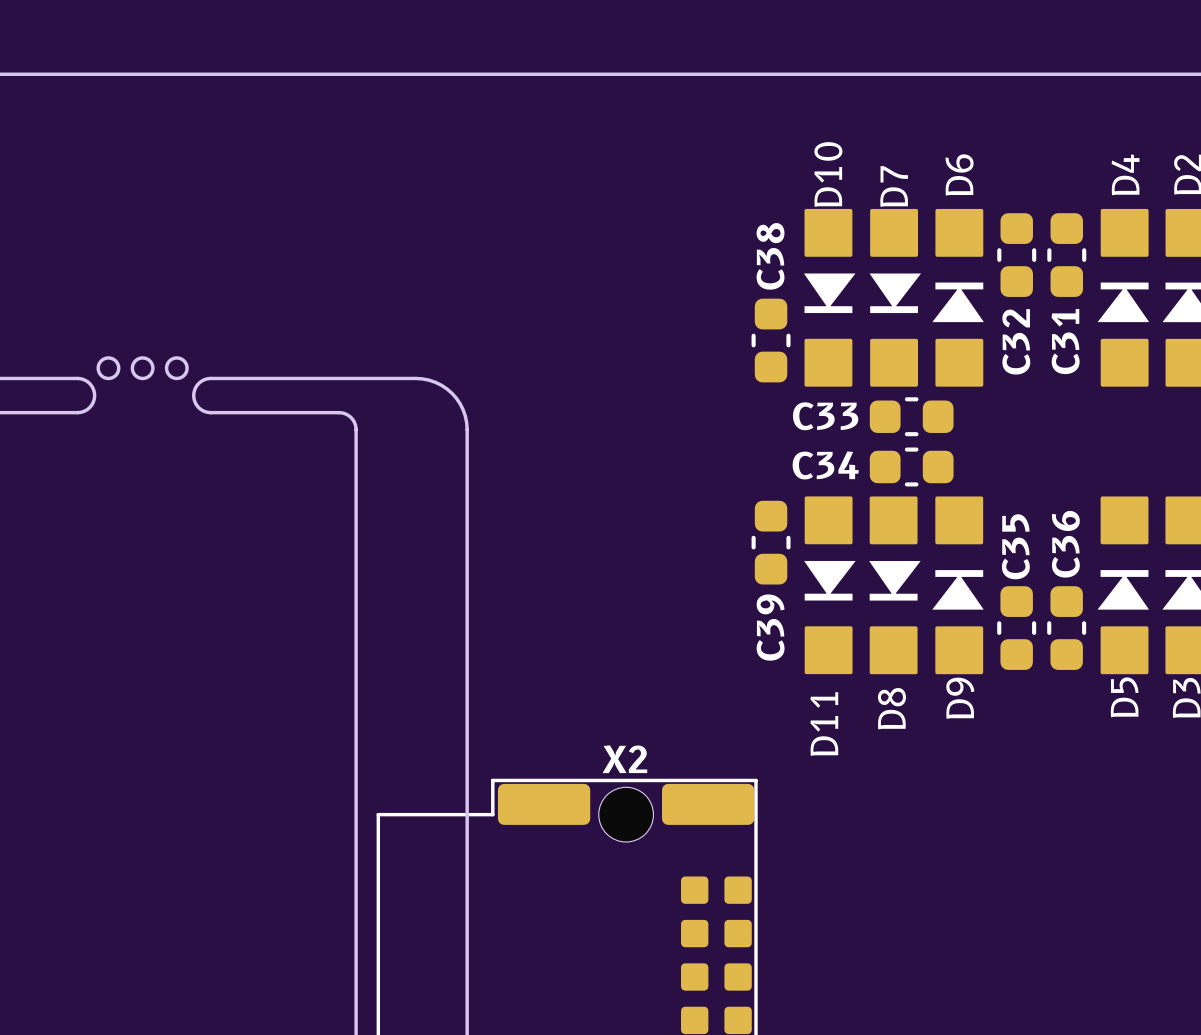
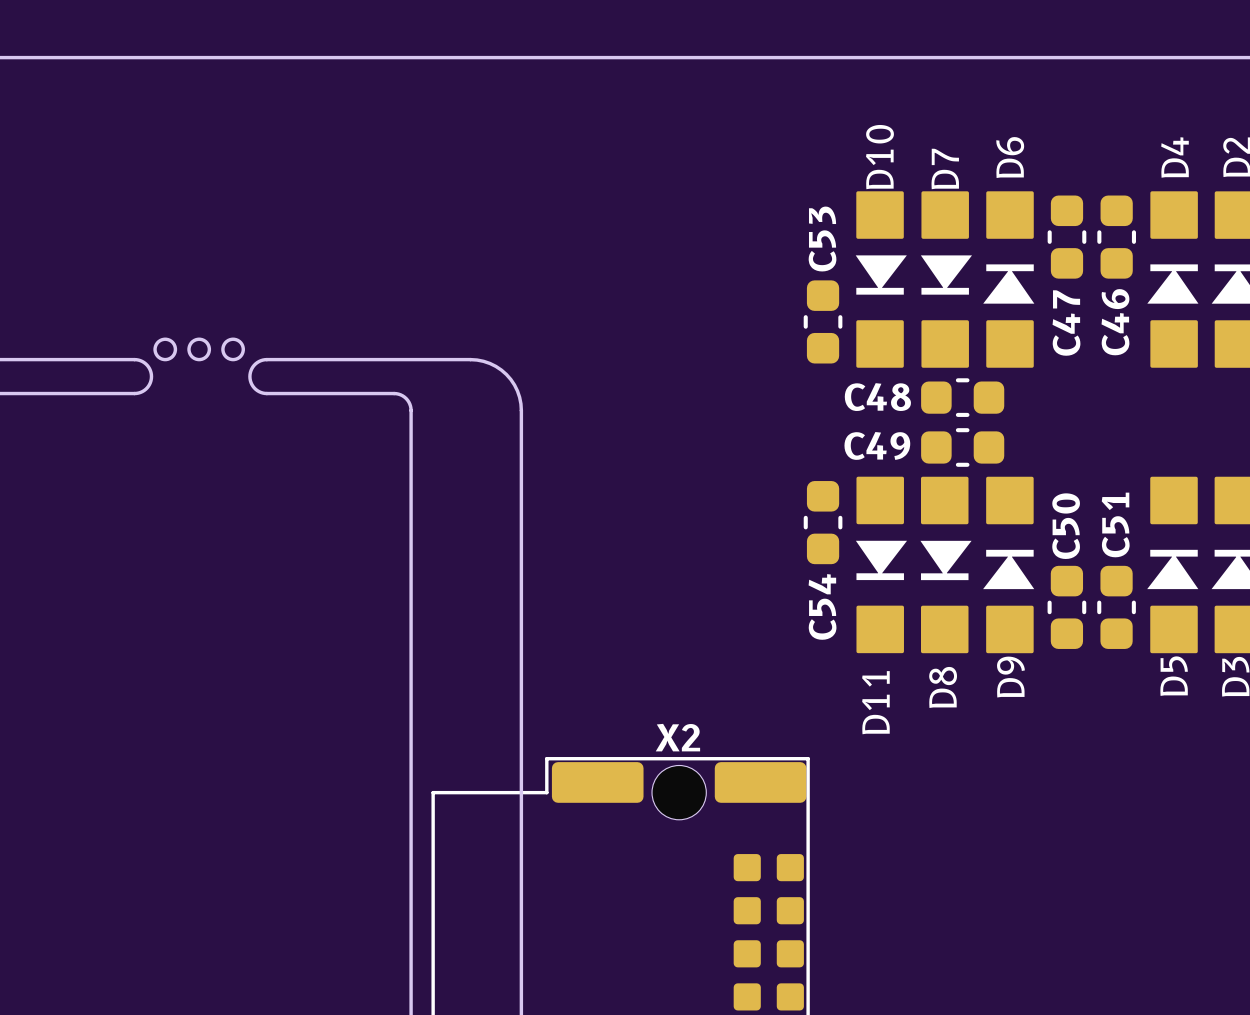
C38 name: C38 (770, 256) -> C53 (822, 239)
C32 name: C32 (1016, 341) -> C47 (1066, 323)
C31 name: C31 (1065, 341) -> C46 (1115, 322)
C33 name: C33 (825, 416) -> C48 (877, 397)
C34 name: C34 (825, 465) -> C49 (877, 445)
C36 name: C36 (1065, 544) -> C51 (1115, 524)
C35 name: C35 (1015, 546) -> C50 (1066, 526)
C39 name: C39 (770, 627) -> C54 (822, 606)

